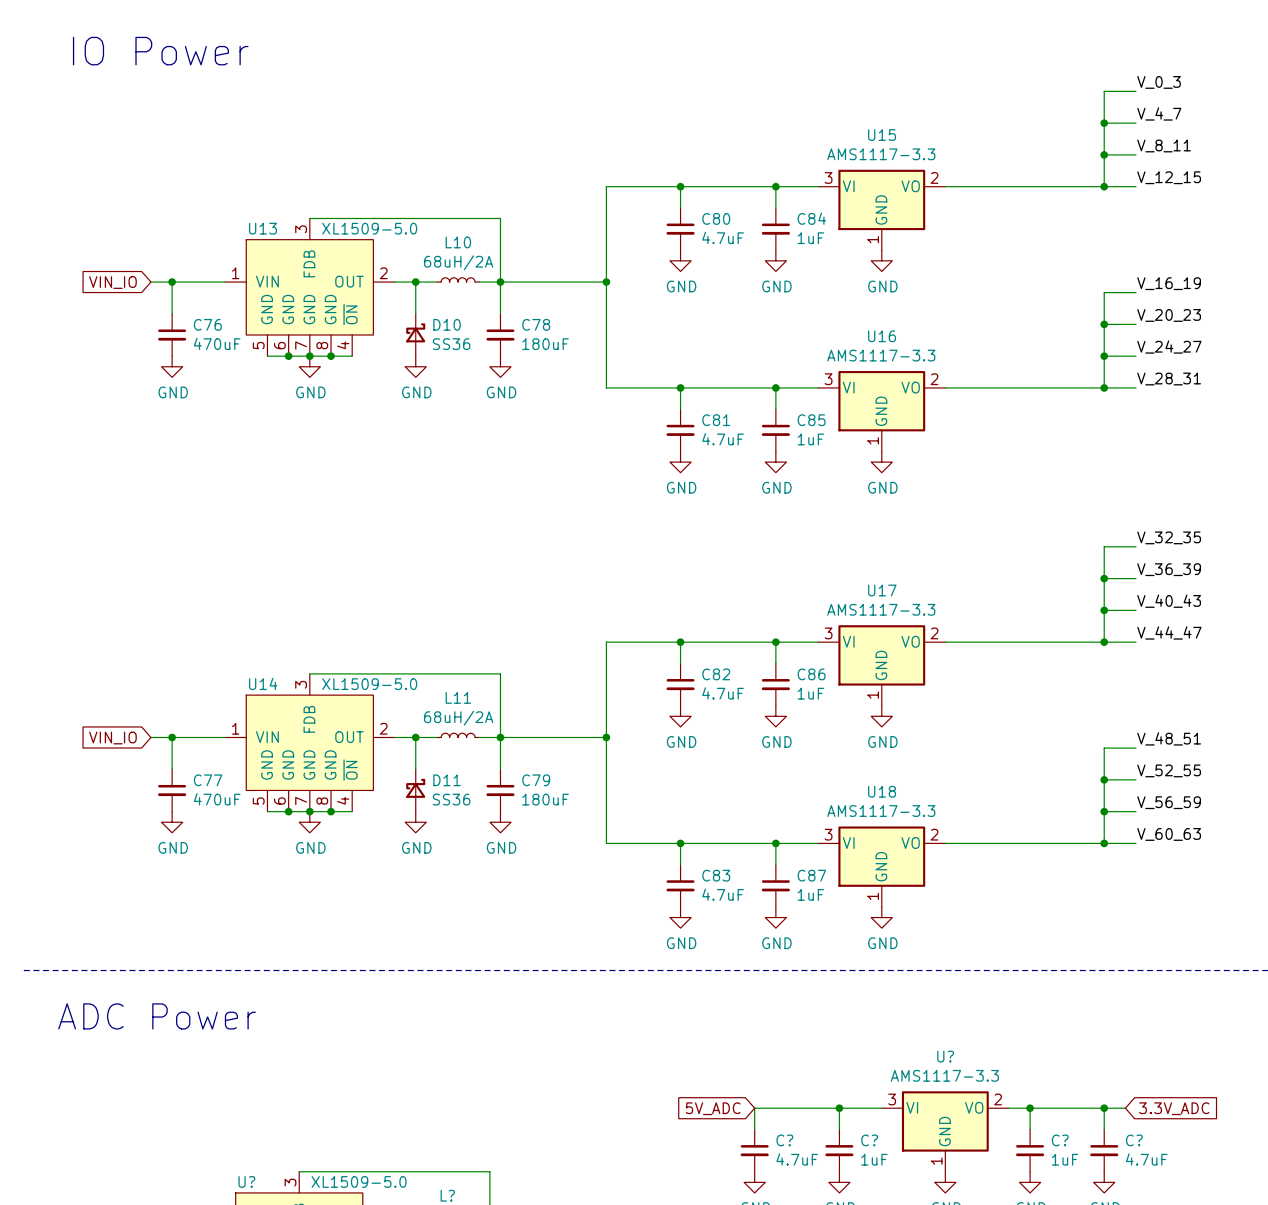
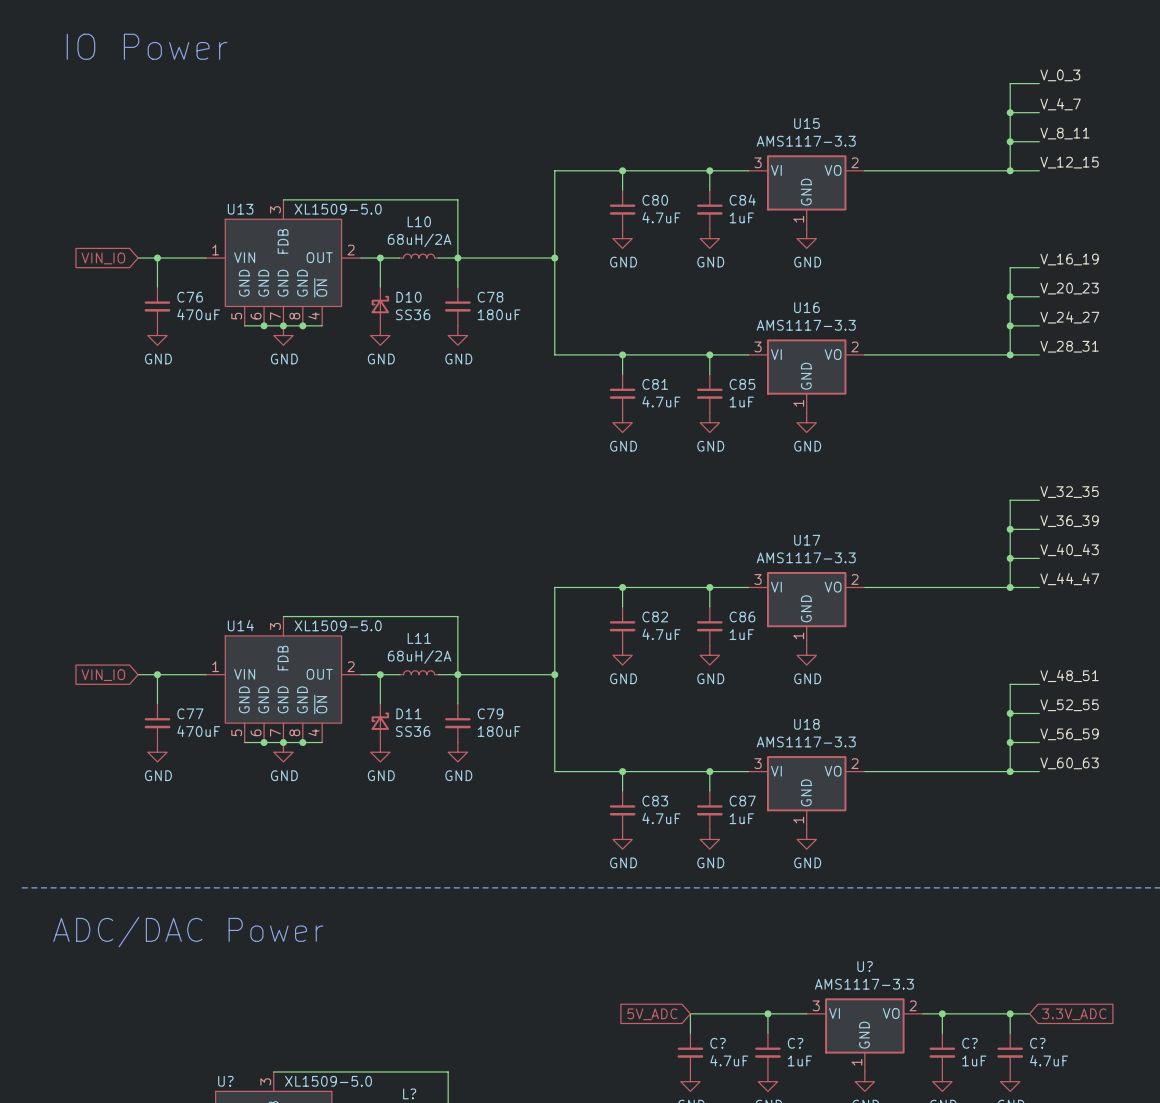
text: ADC Power (157, 1016) -> ADC/DAC Power (188, 932)

